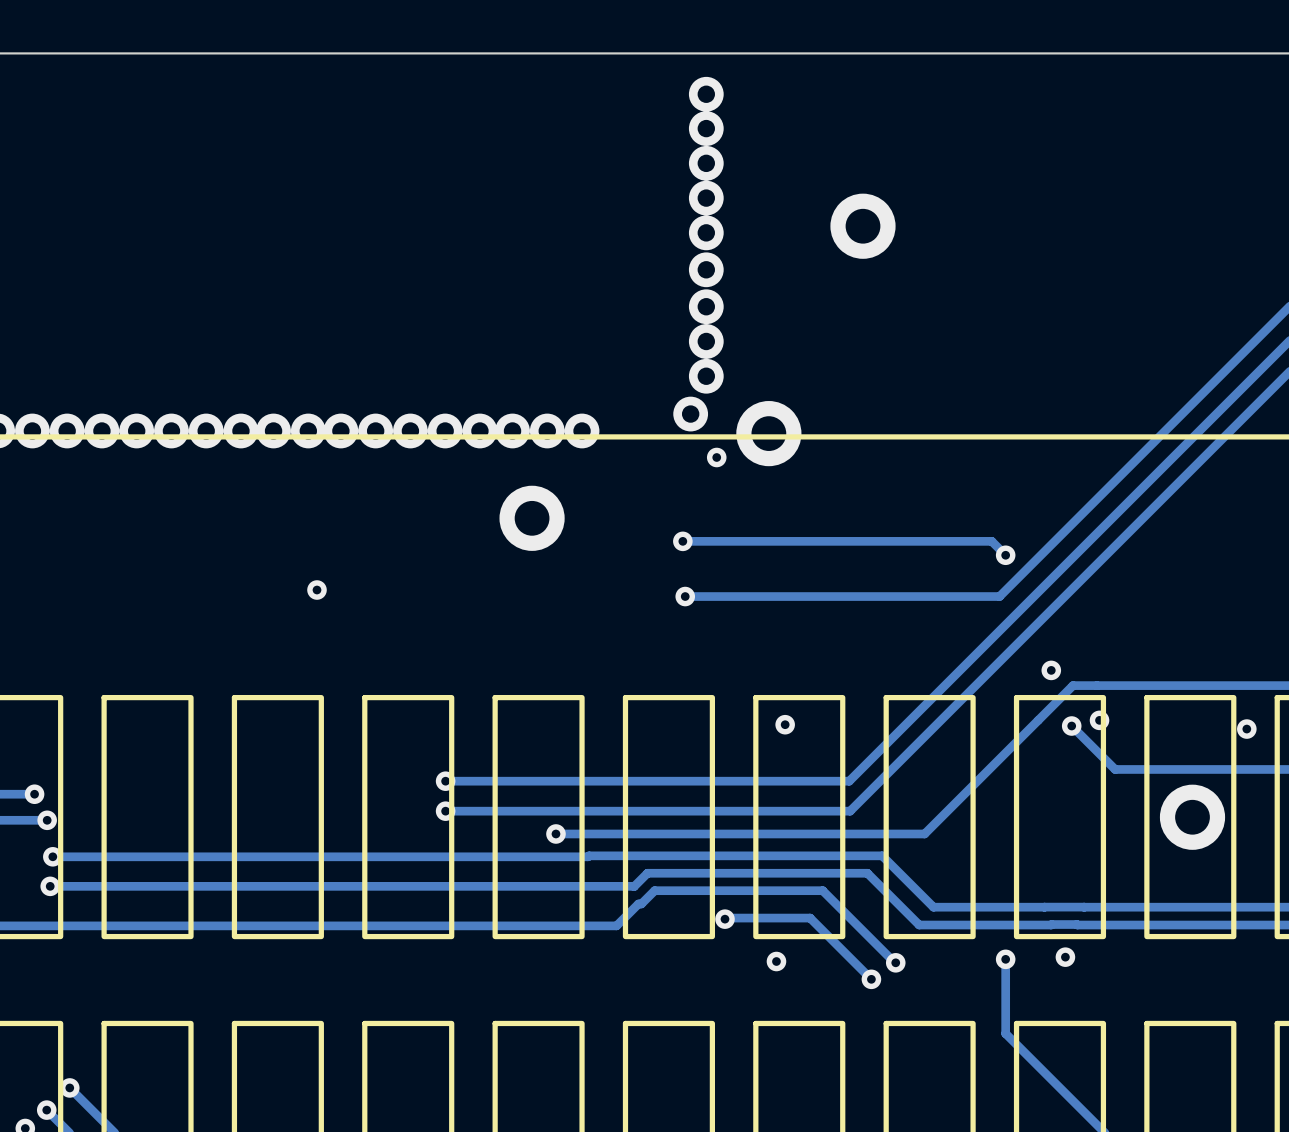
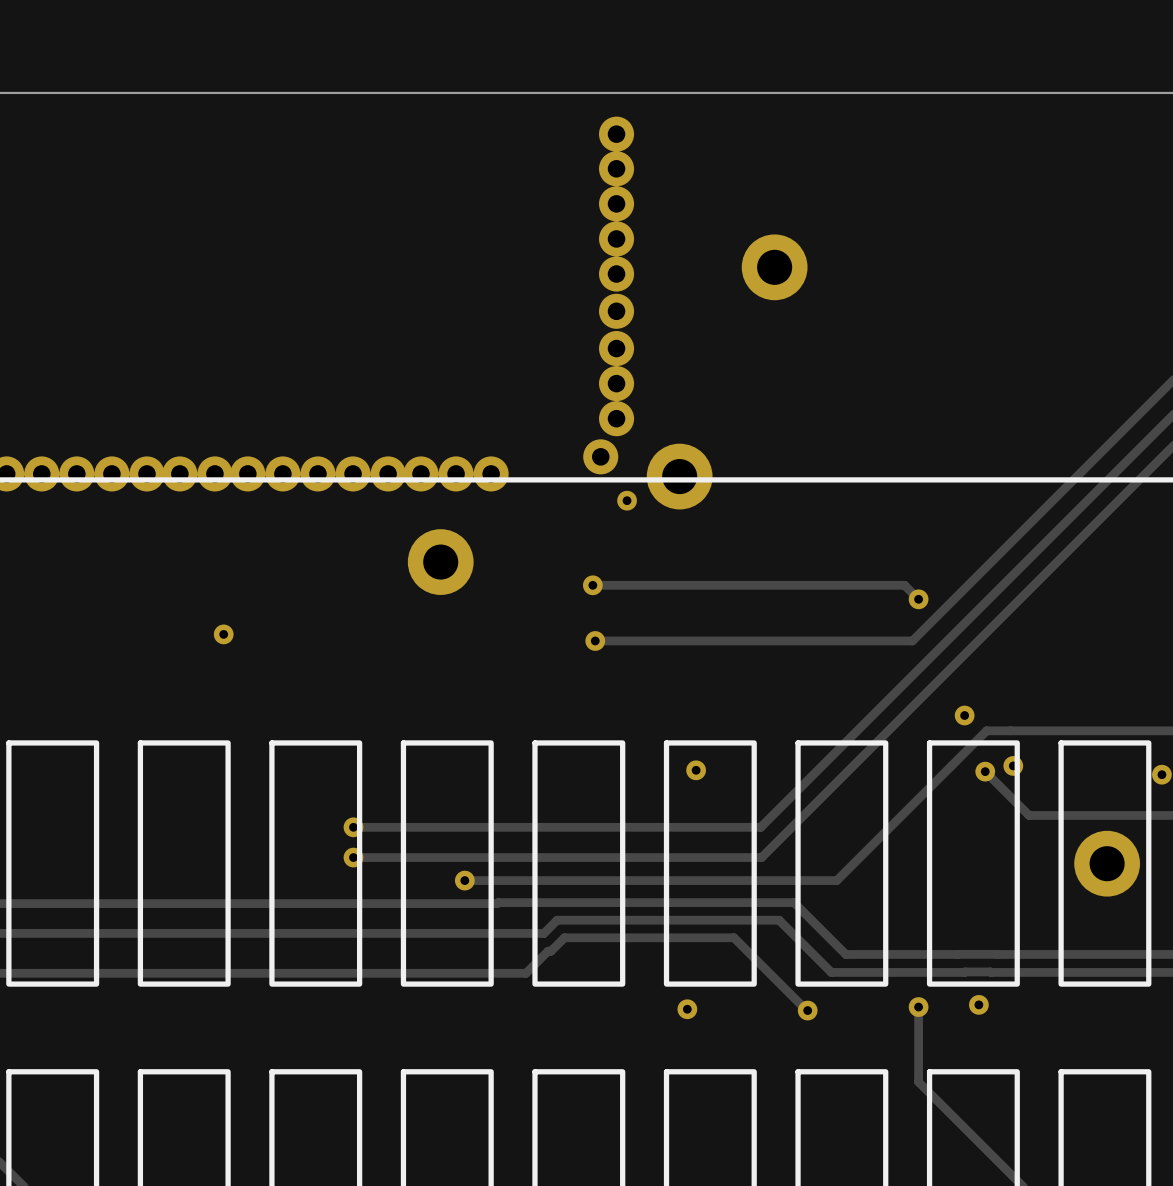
track: (724, 919) (810, 918) (871, 979) -> none
via: (724, 919) -> none
via: (871, 979) -> none

